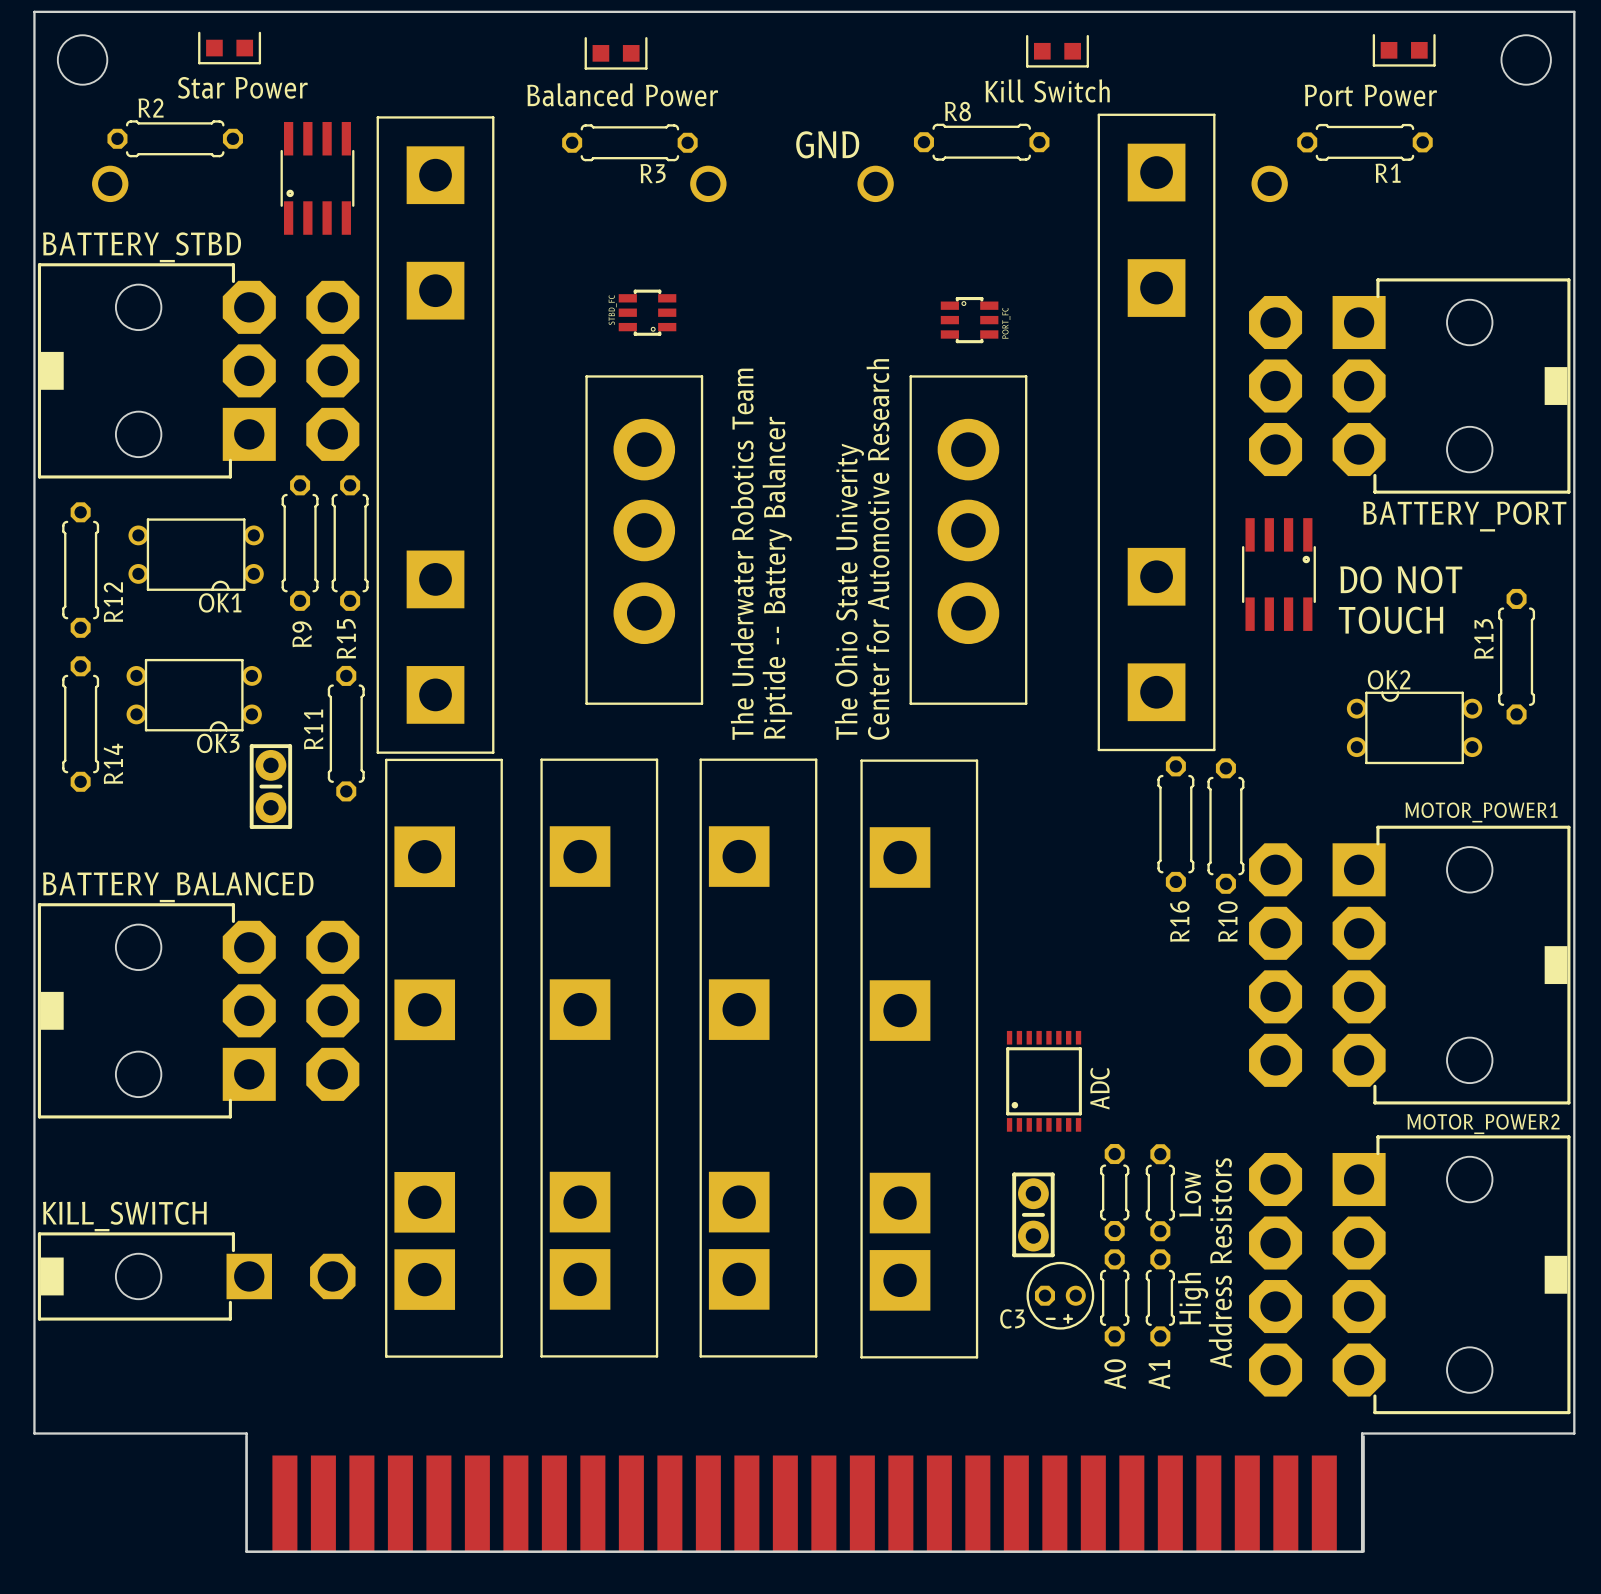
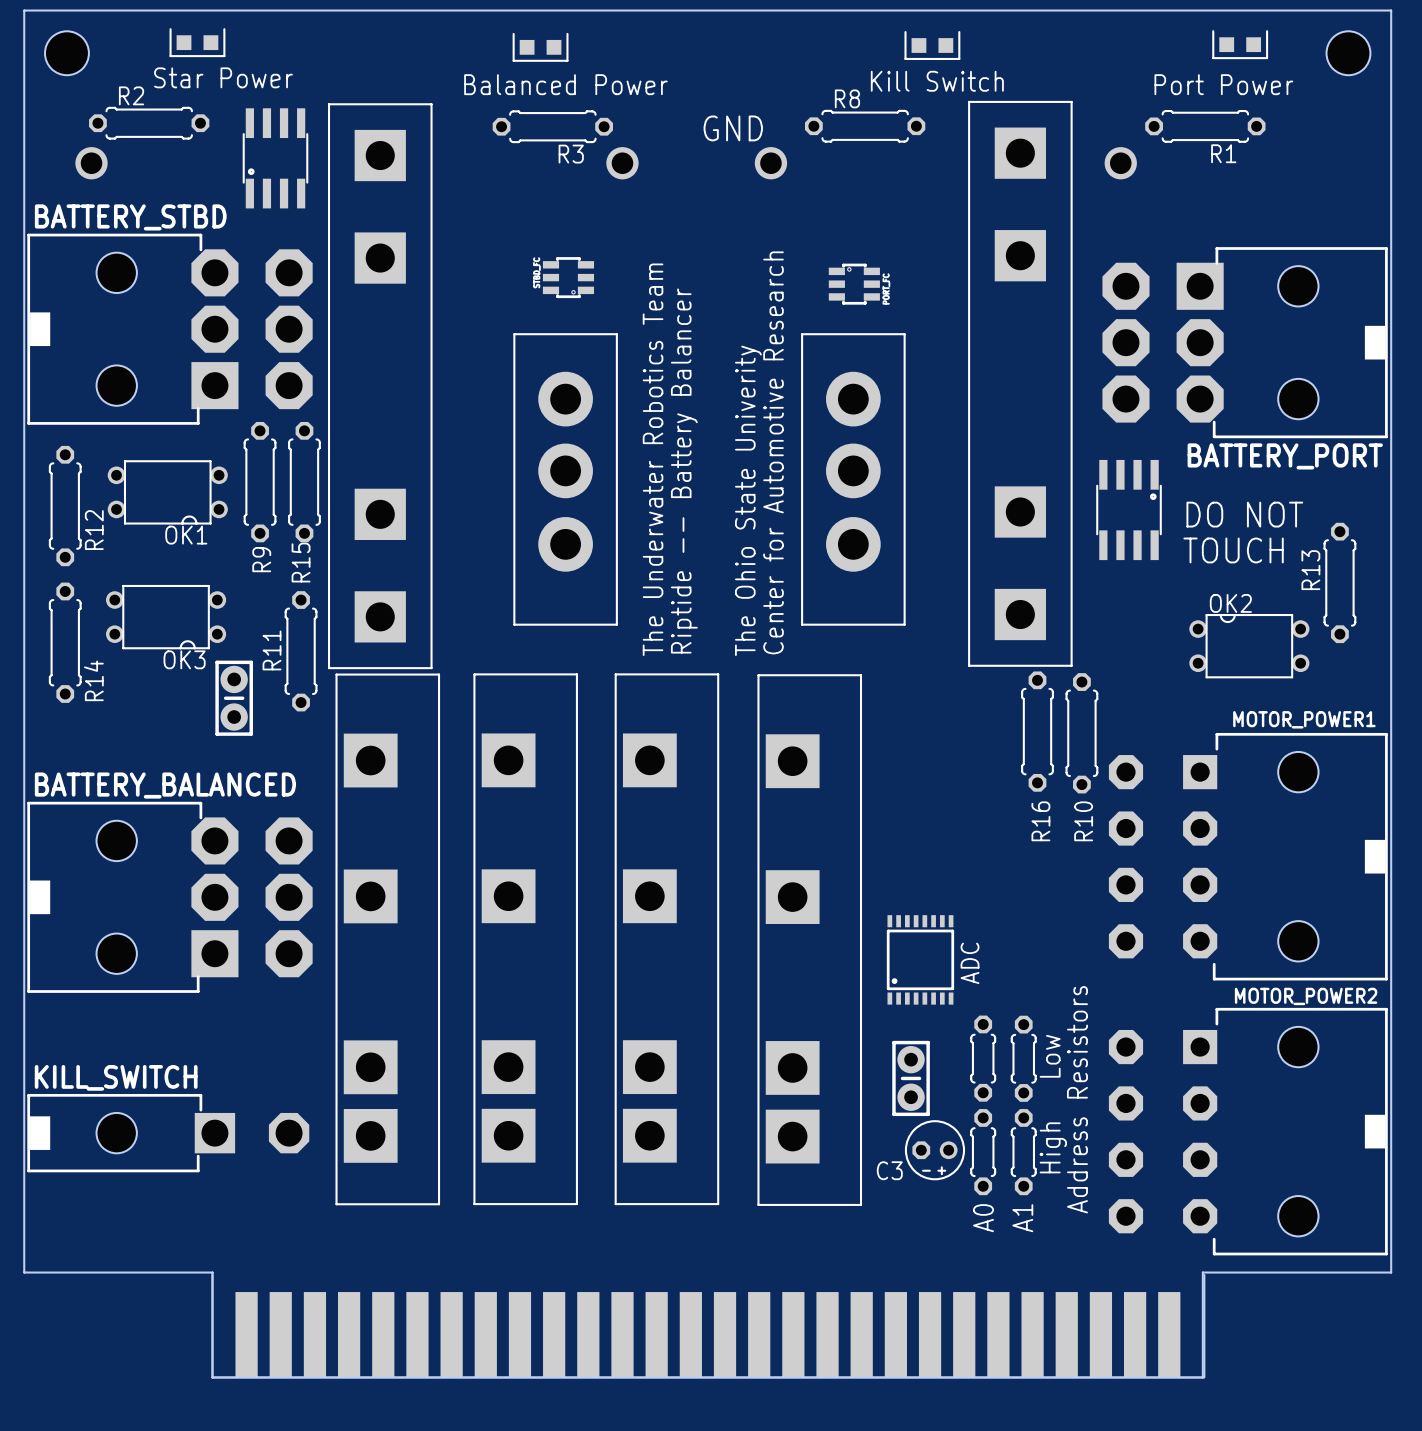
MOTOR_POWER1 footprint: [1249, 825, 1571, 1105] -> [1108, 732, 1388, 981]
MOTOR_POWER2 footprint: [1249, 1135, 1571, 1415] -> [1108, 1007, 1388, 1256]

